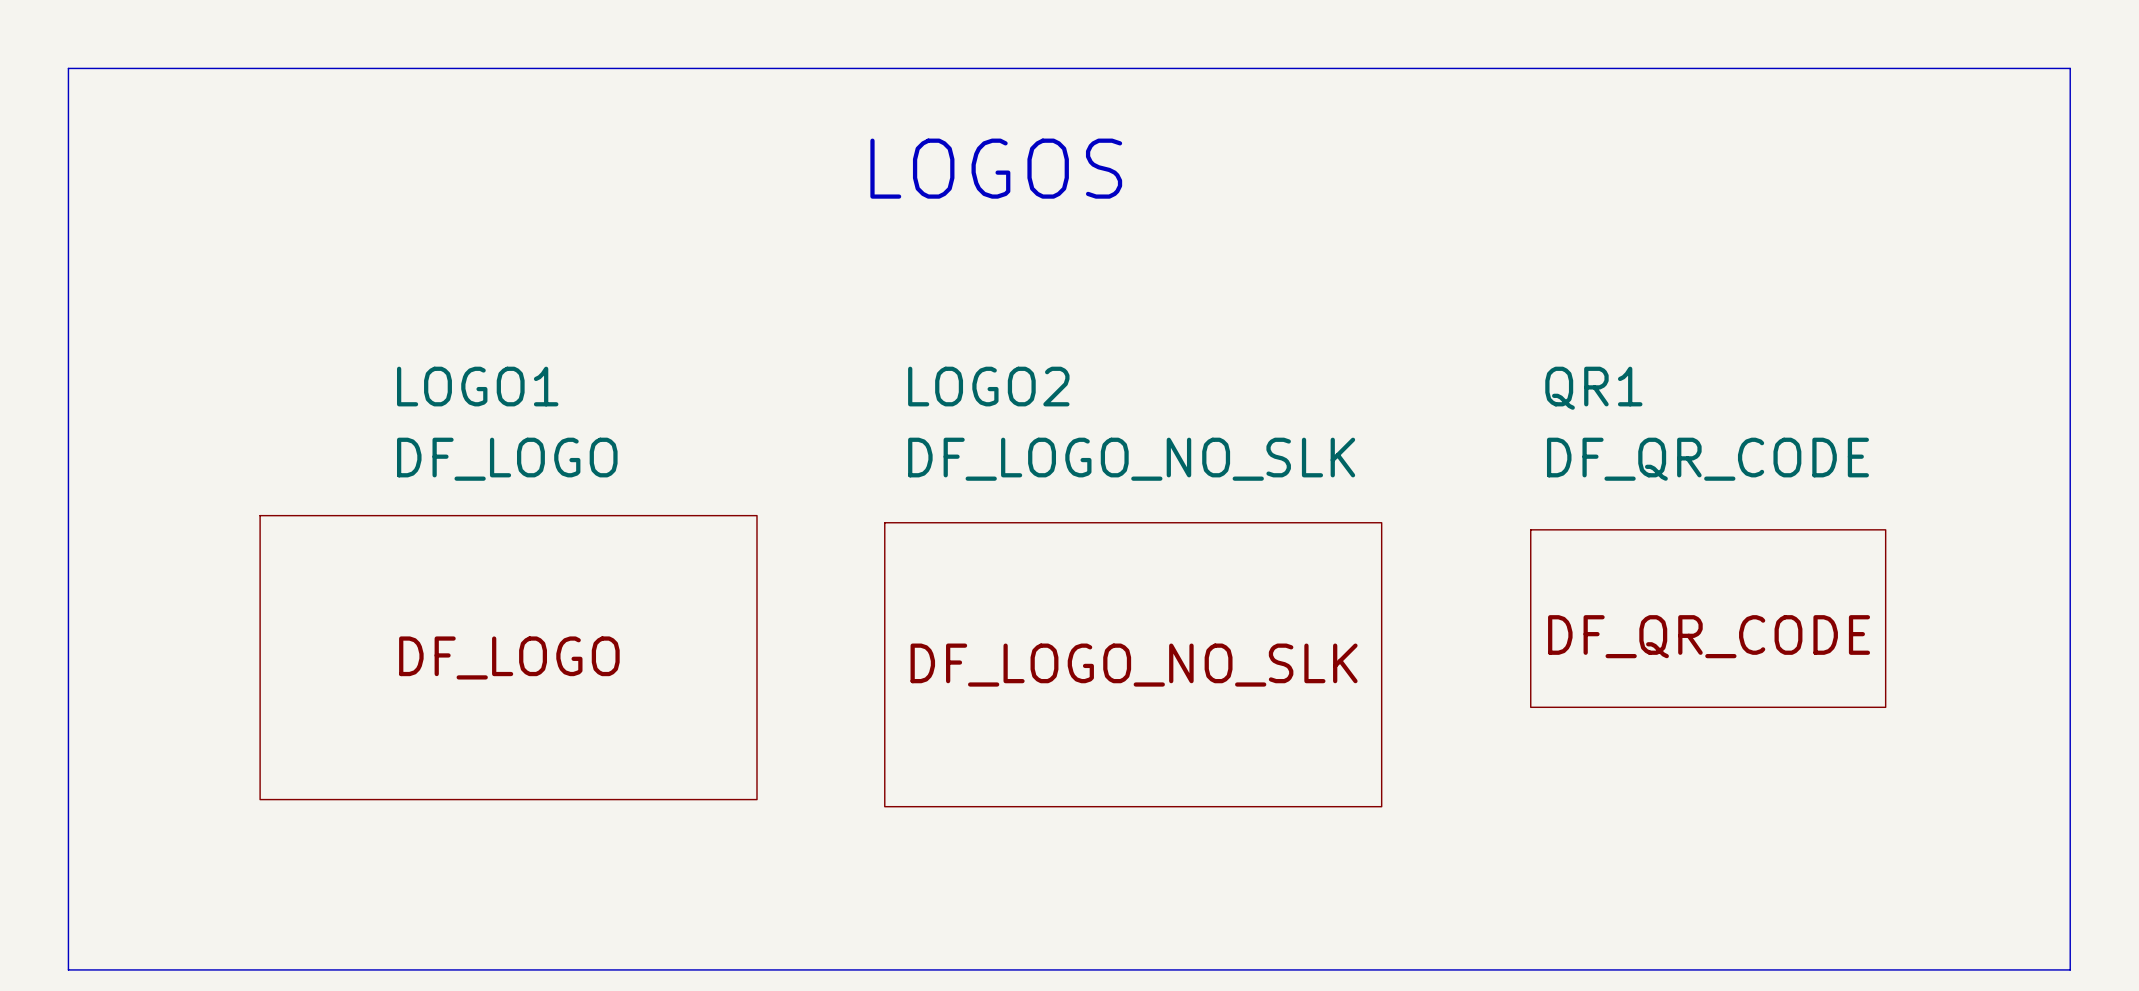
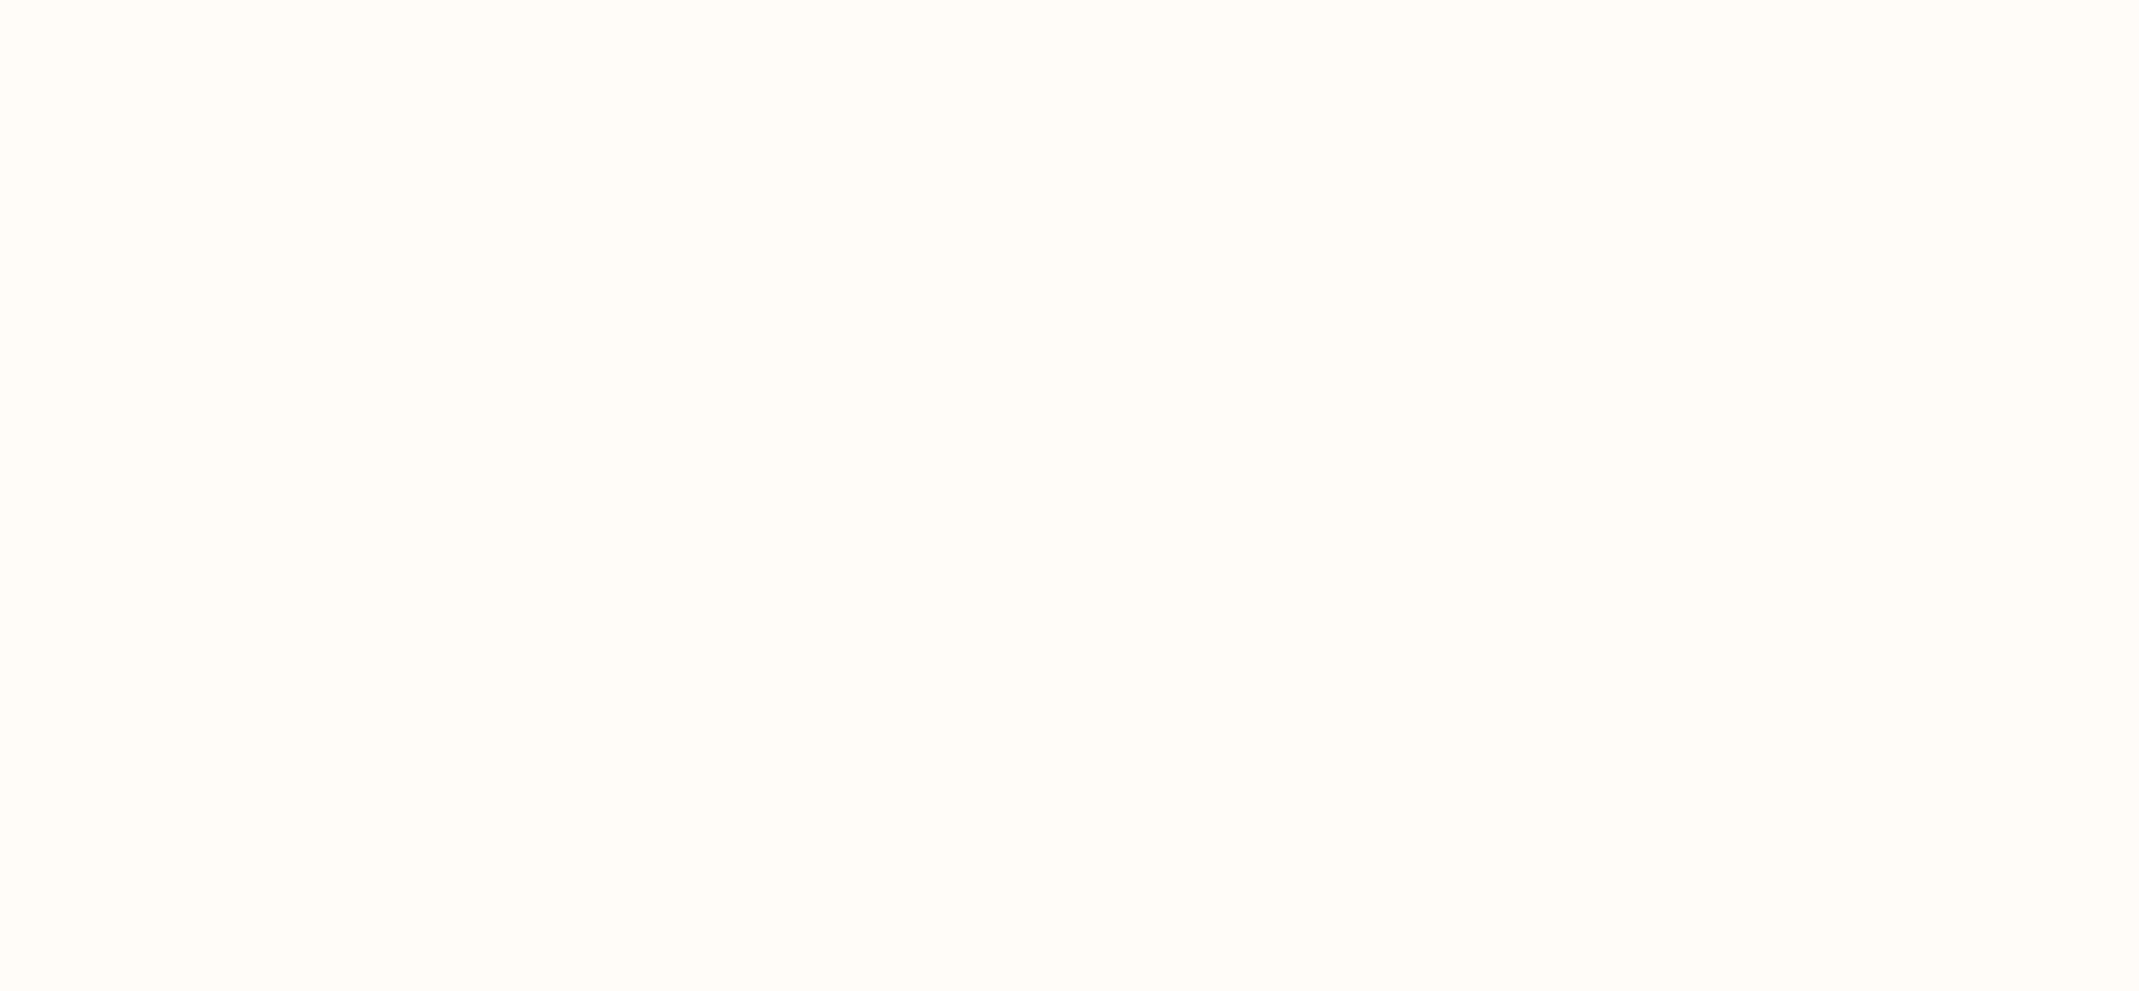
line: (68, 68) (2070, 68) (2070, 969) (68, 969) (68, 68) -> none
text: LOGOS (996, 168) -> none
QR1: DF_QR_CODE (1708, 618) -> none
LOGO1: DF_LOGO (508, 657) -> none
LOGO2: DF_LOGO_NO_SLK (1133, 664) -> none

